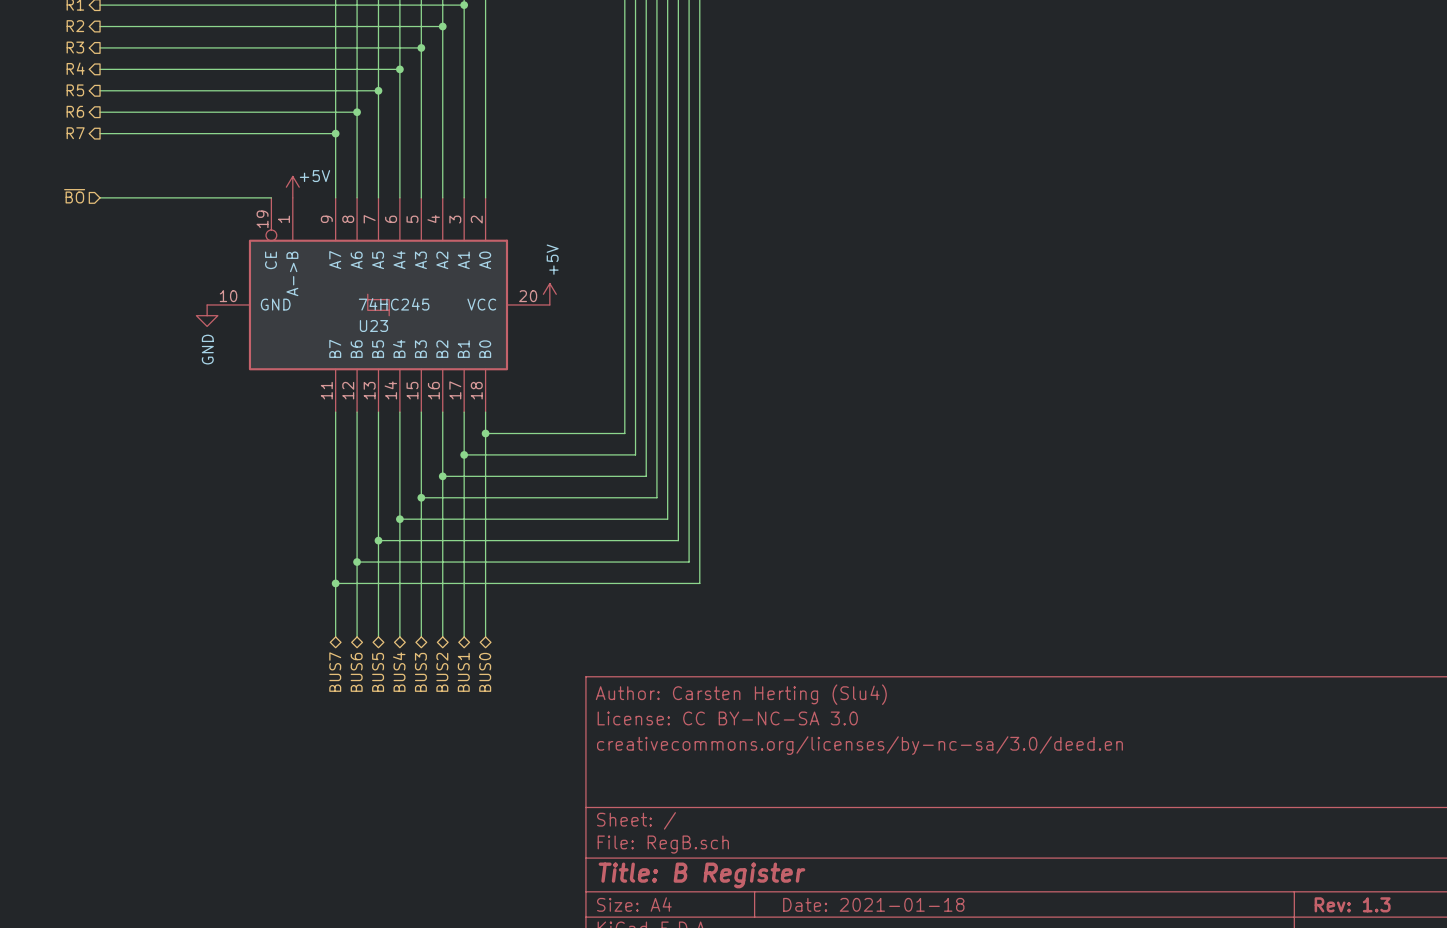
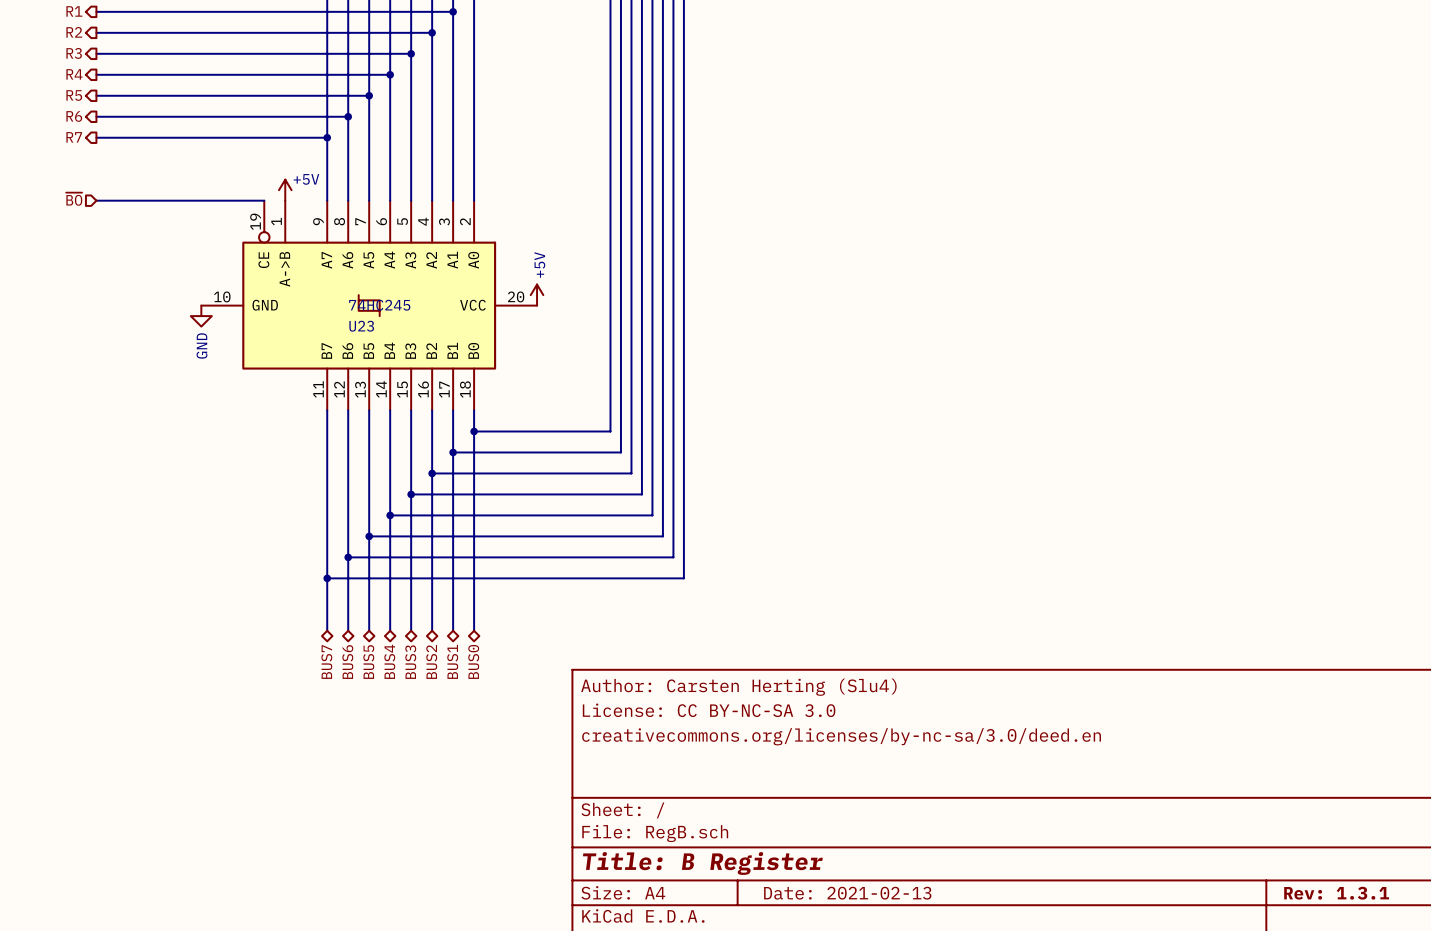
title block: Date: 2021-01-18 (873, 904) -> Date: 2021-02-13 (847, 893)
title block: Rev: 1.3 (1352, 904) -> Rev: 1.3.1 (1336, 893)

